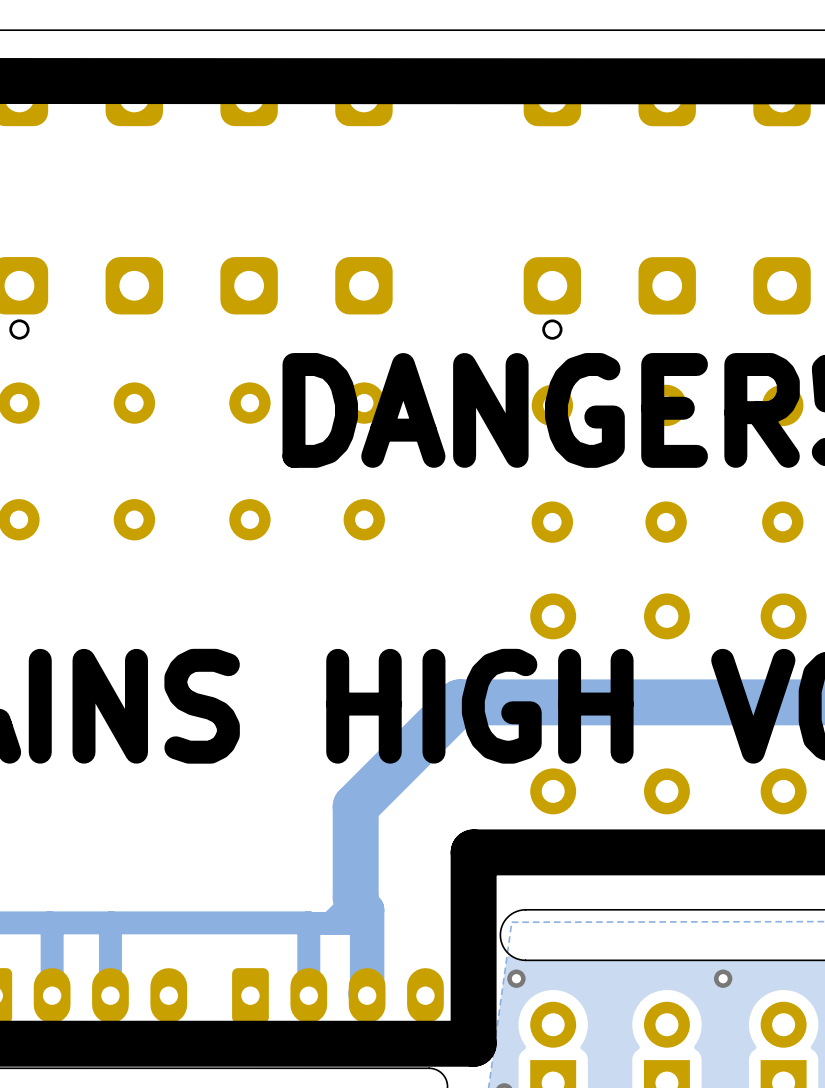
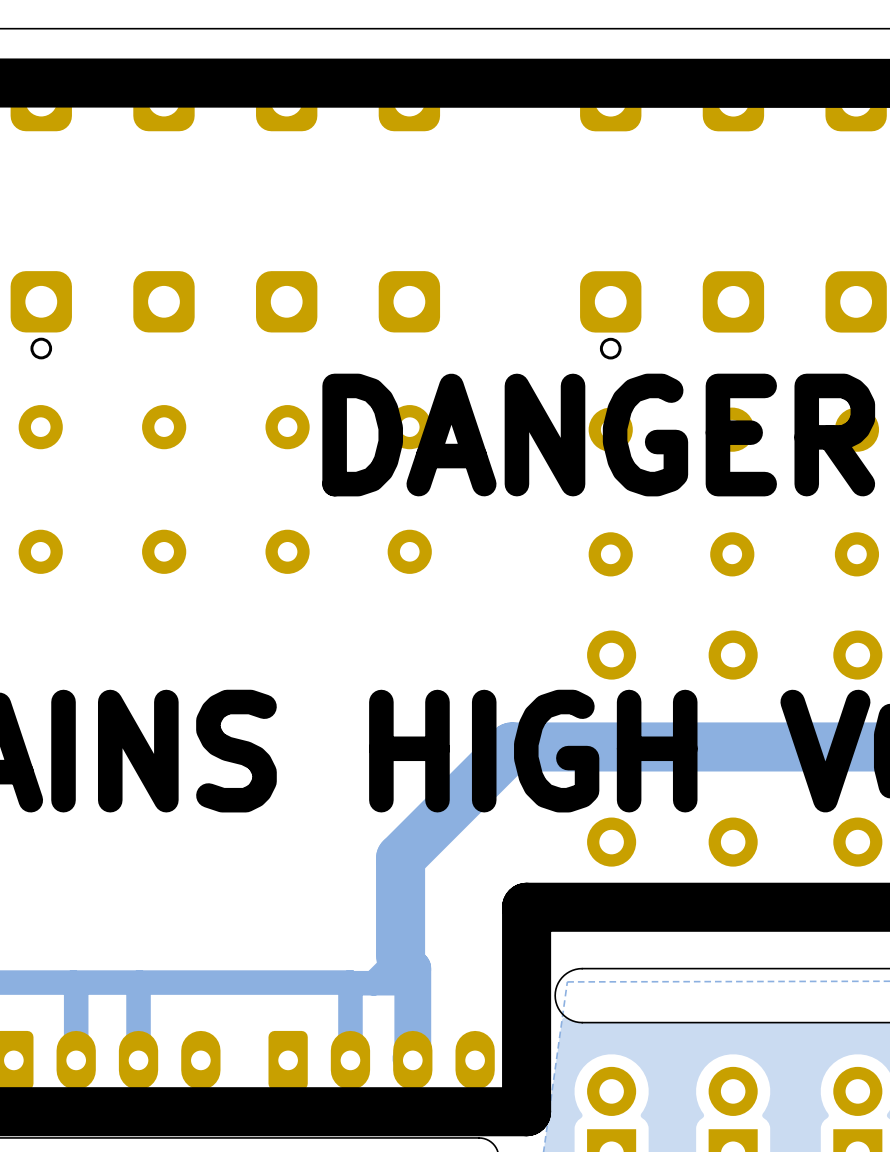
via: (516, 978) -> none
via: (723, 978) -> none

